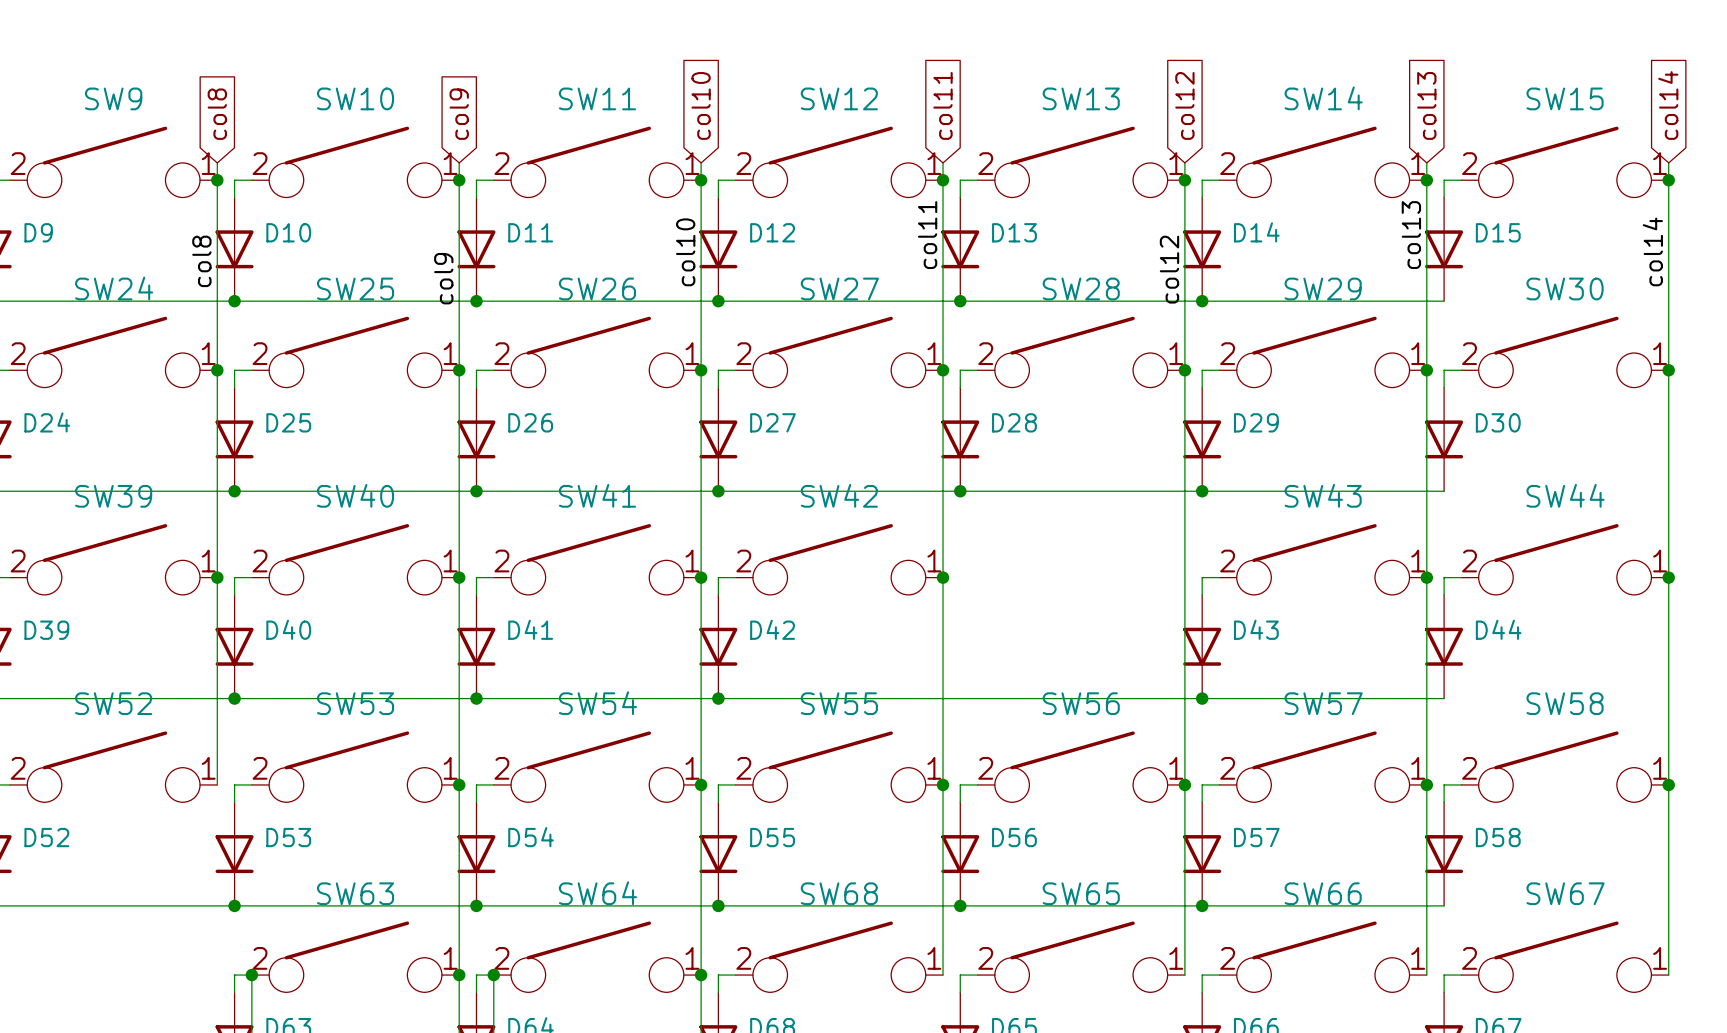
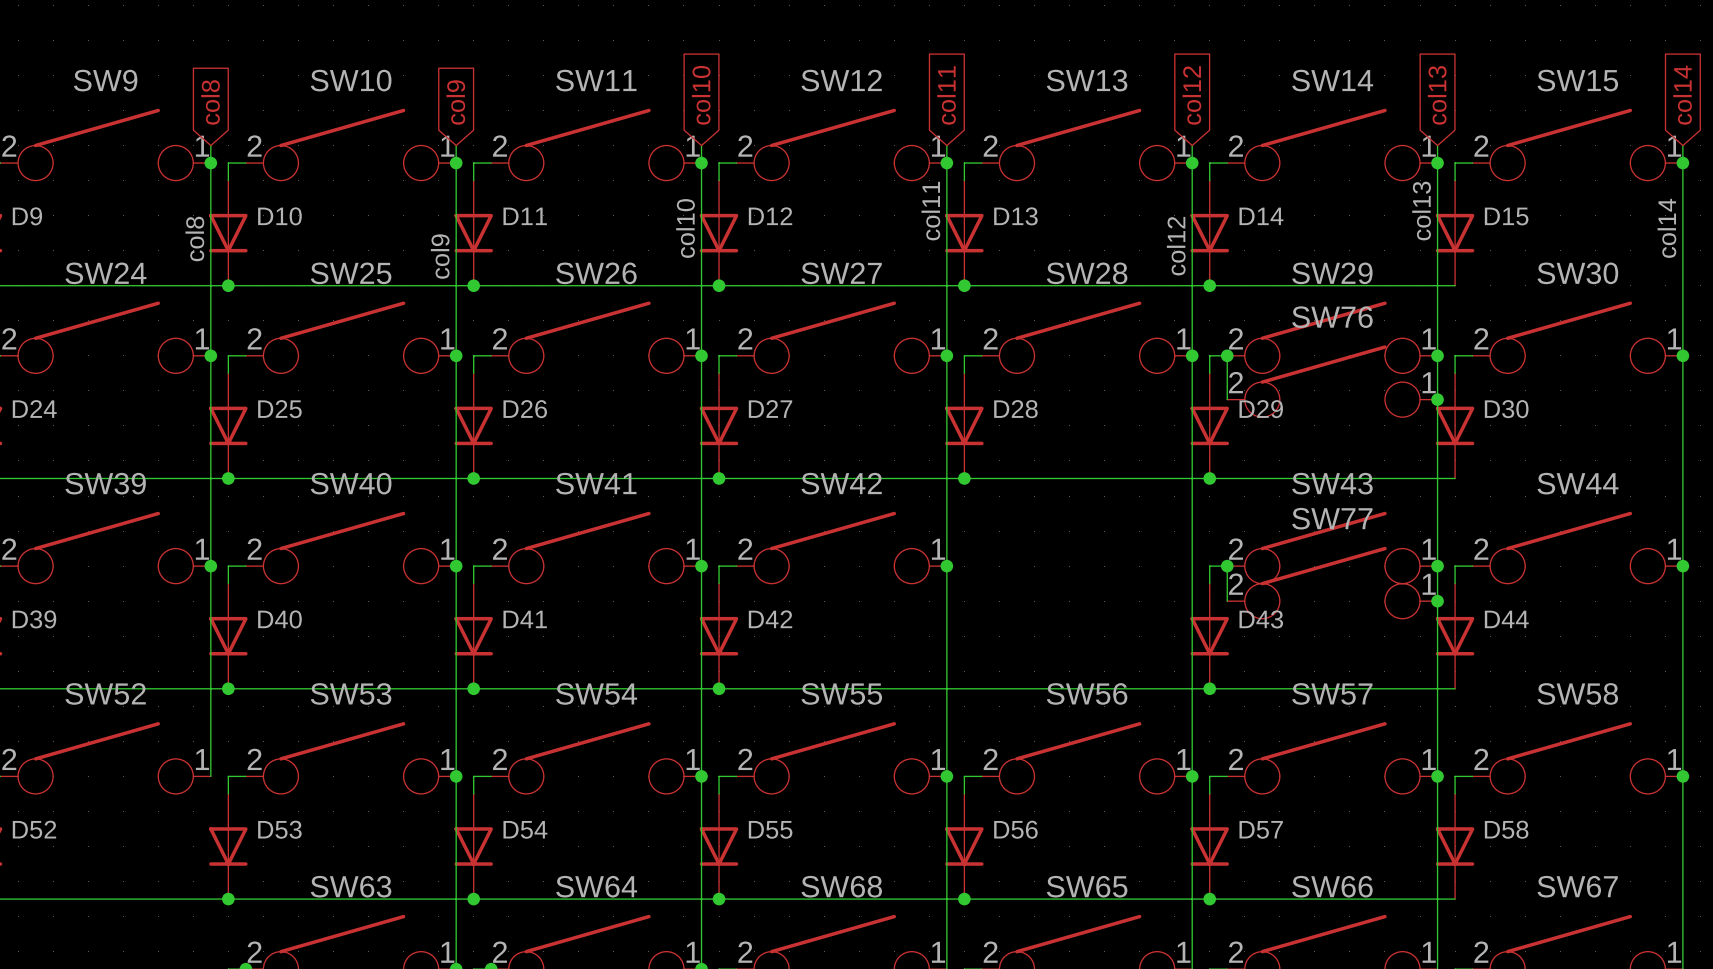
wire: none -> (1227, 355) (1227, 399)
junction: none -> (1227, 355)
SW76: none -> (1332, 381)
junction: none -> (1437, 399)
wire: none -> (1227, 566) (1227, 601)
junction: none -> (1227, 566)
SW77: none -> (1332, 582)
junction: none -> (1437, 601)

